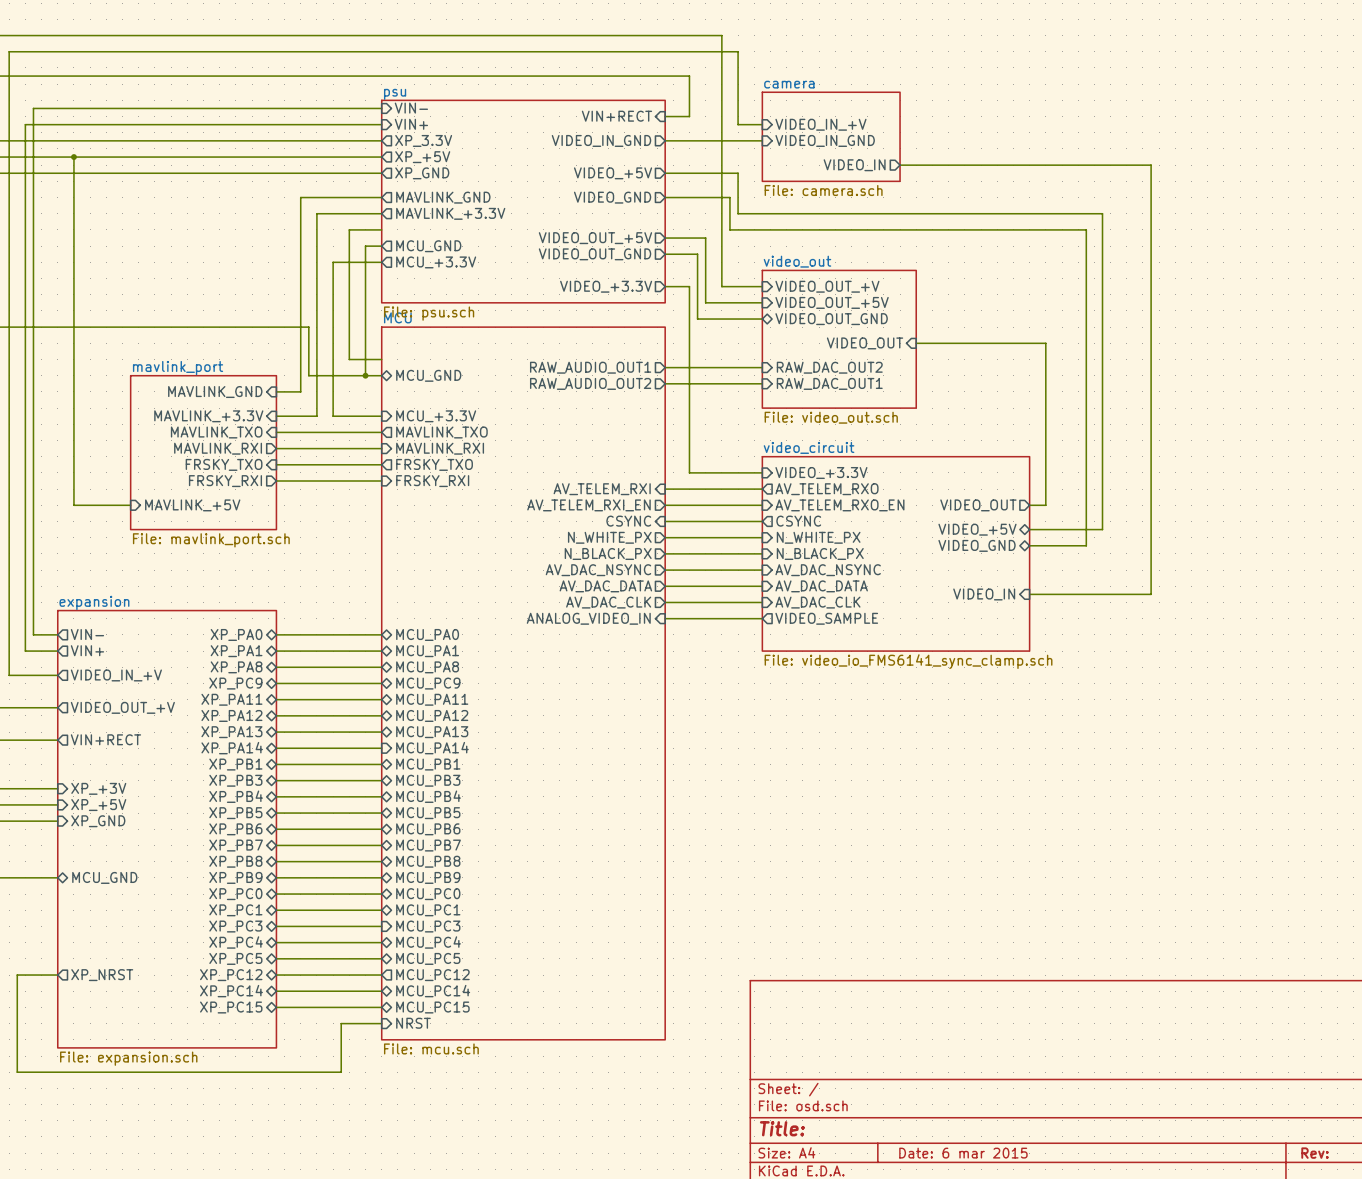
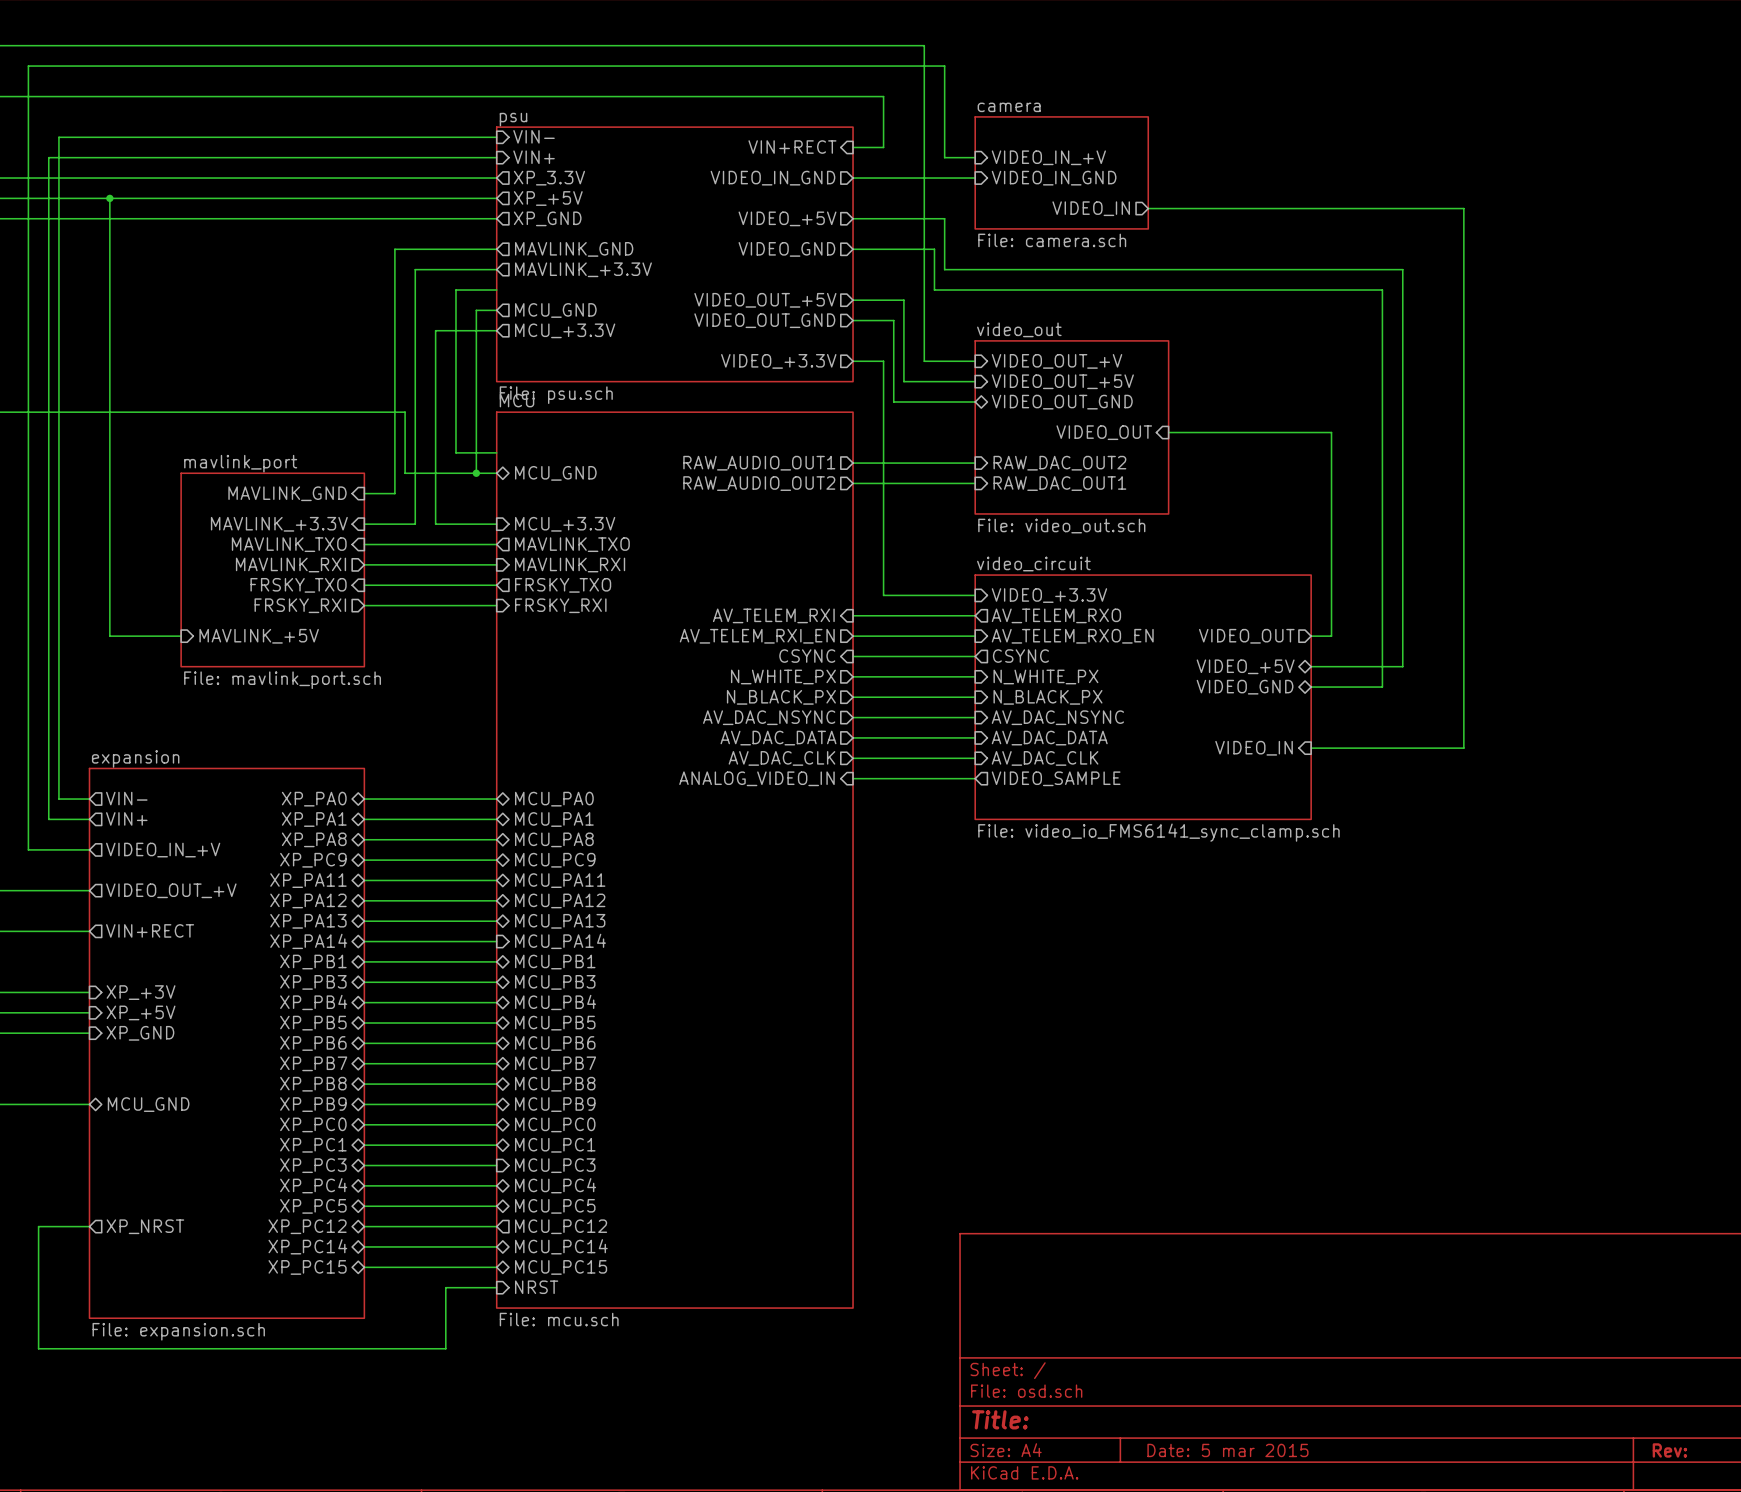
title block: Date: 6 mar 2015 (963, 1153) -> Date: 5 mar 2015 (1227, 1450)

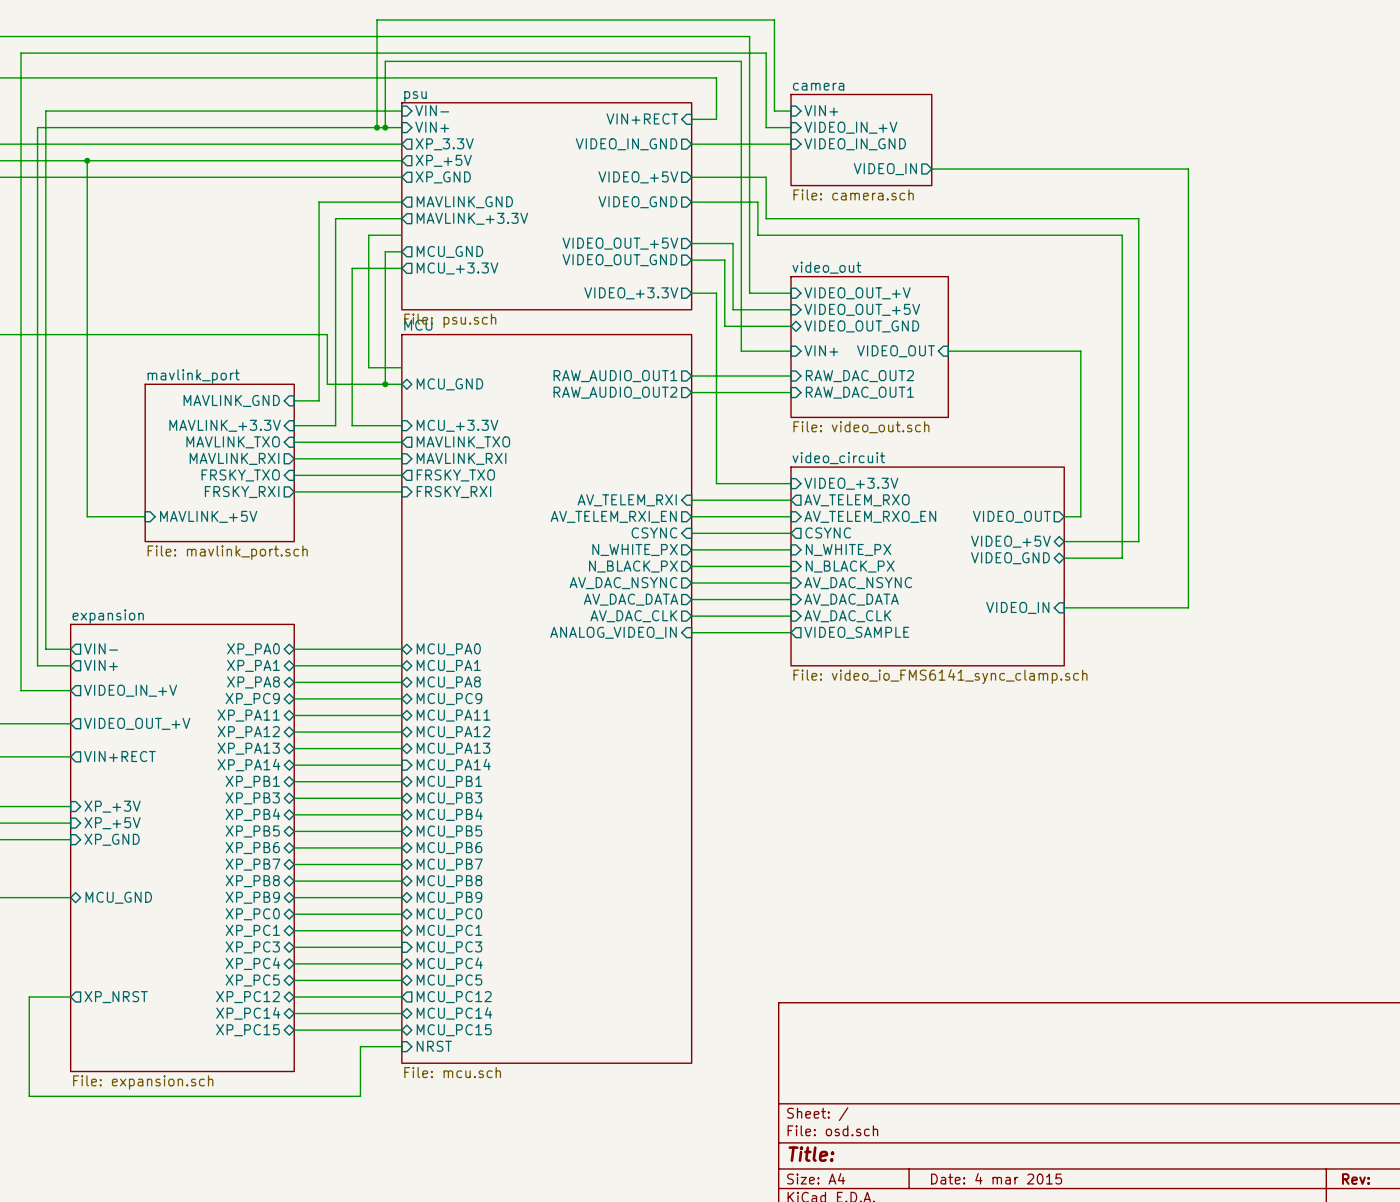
sheet pin: none -> VIN+ (821, 110)
wire: none -> (791, 111) (774, 111) (774, 19) (377, 19) (377, 127)
junction: none -> (377, 127)
wire: none -> (385, 127) (385, 61) (741, 61) (741, 351) (791, 351)
junction: none -> (385, 127)
sheet pin: none -> VIN+ (821, 350)
title block: Date: 5 mar 2015 (1227, 1450) -> Date: 4 mar 2015 (996, 1178)

